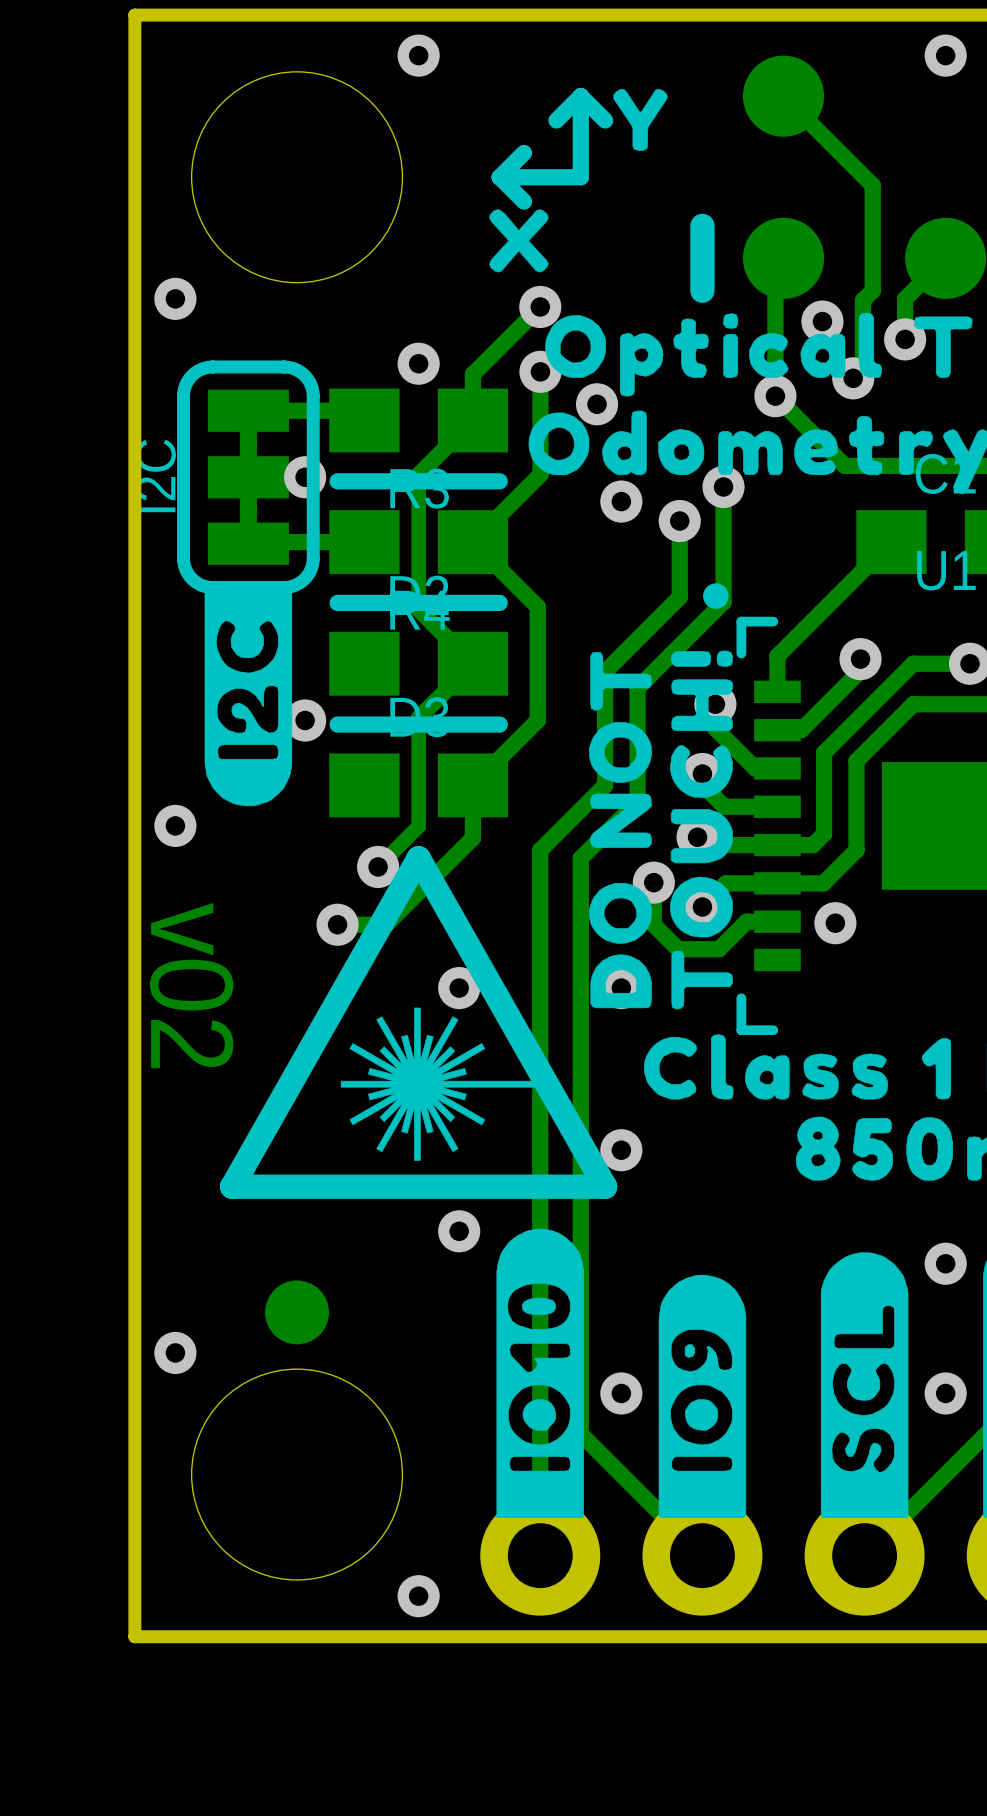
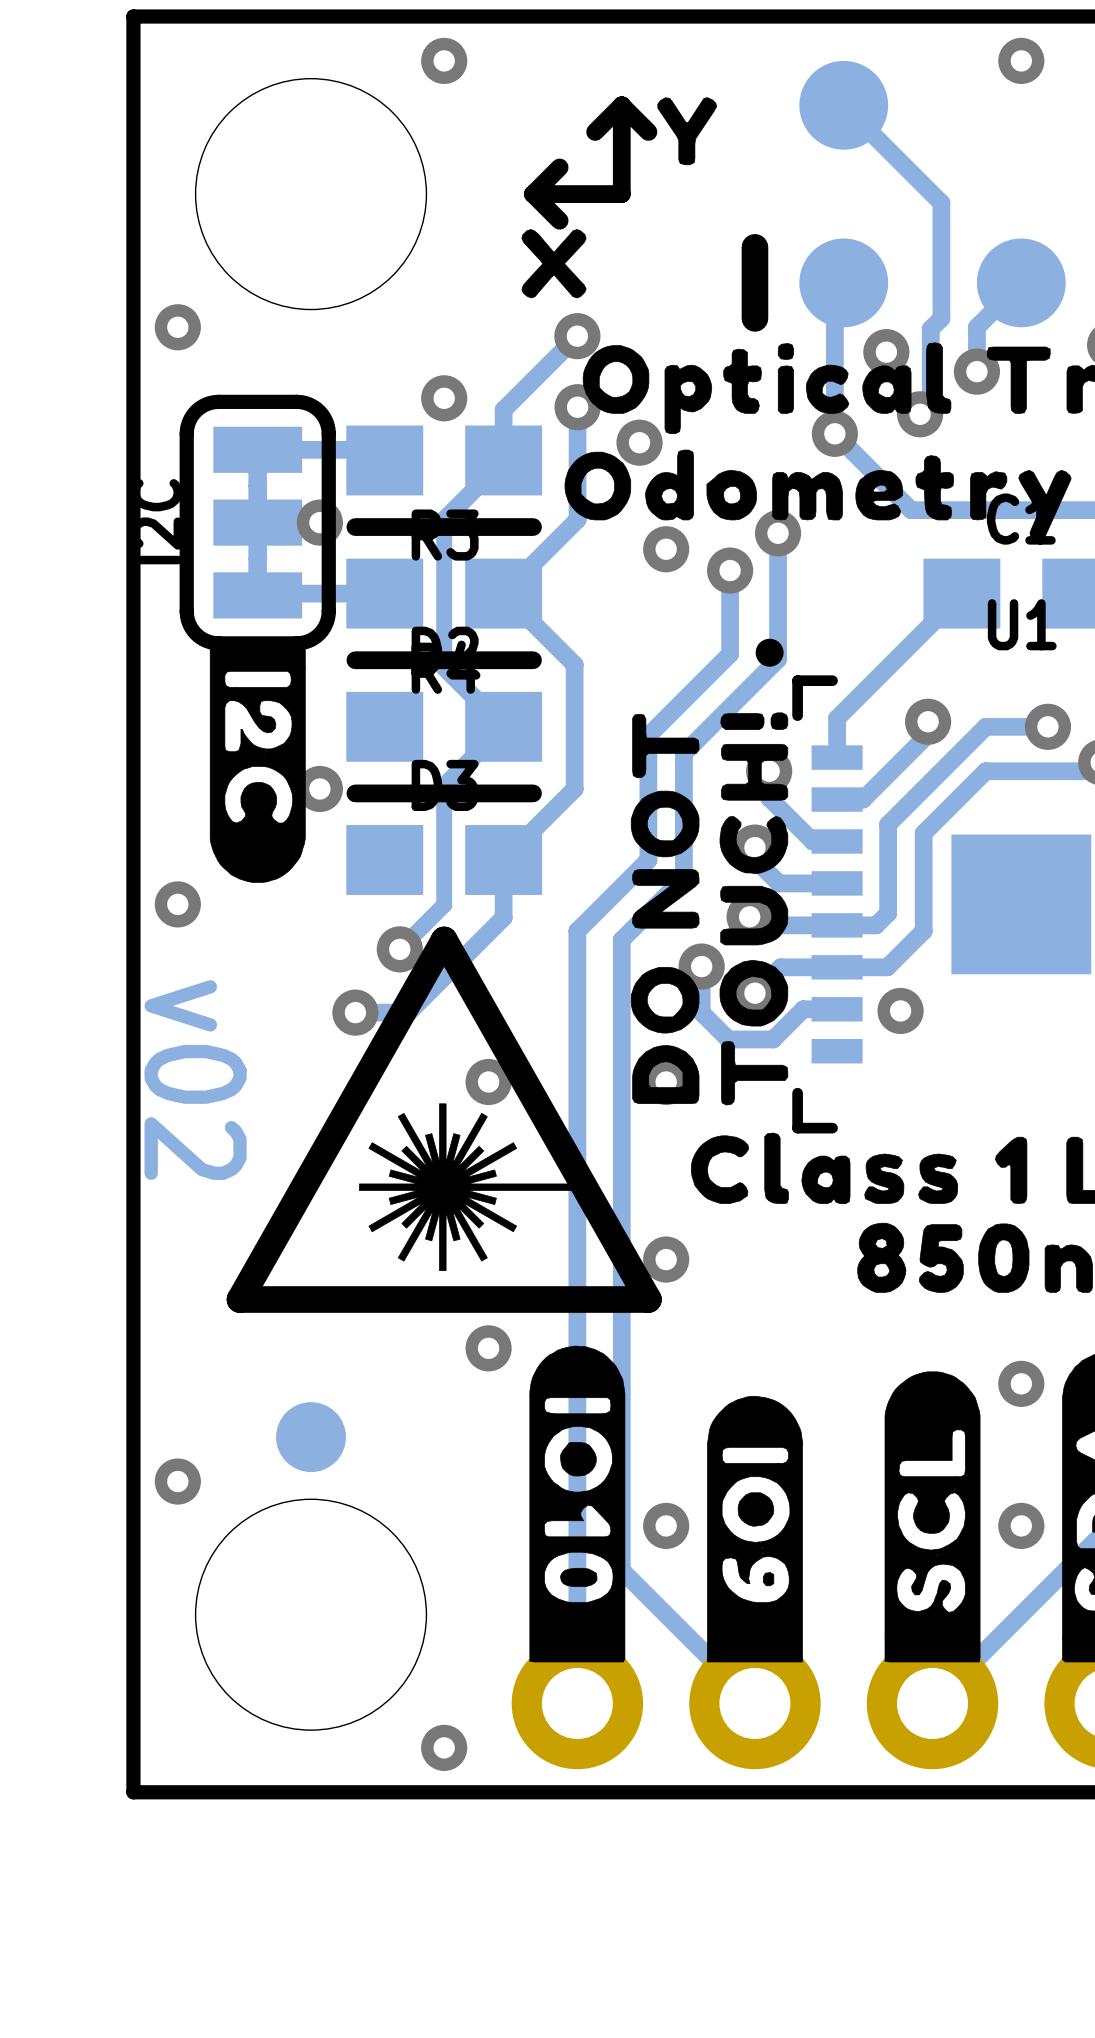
drawing shape: [204, 587, 293, 807] -> [209, 643, 306, 883]
drawing shape: [496, 1228, 585, 1519] -> [529, 1345, 626, 1663]
drawing shape: [658, 1274, 747, 1519] -> [707, 1395, 803, 1663]

